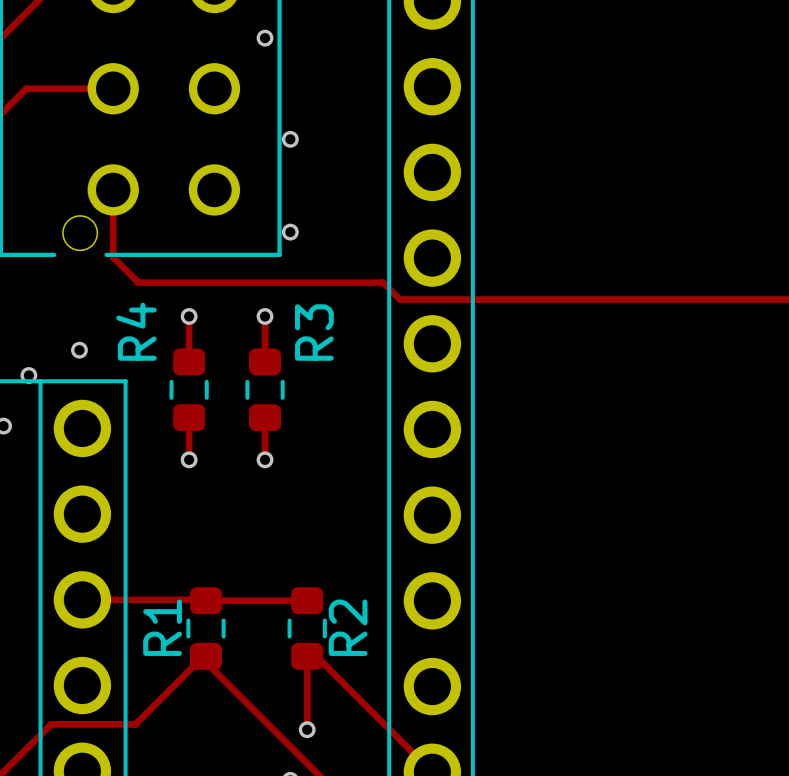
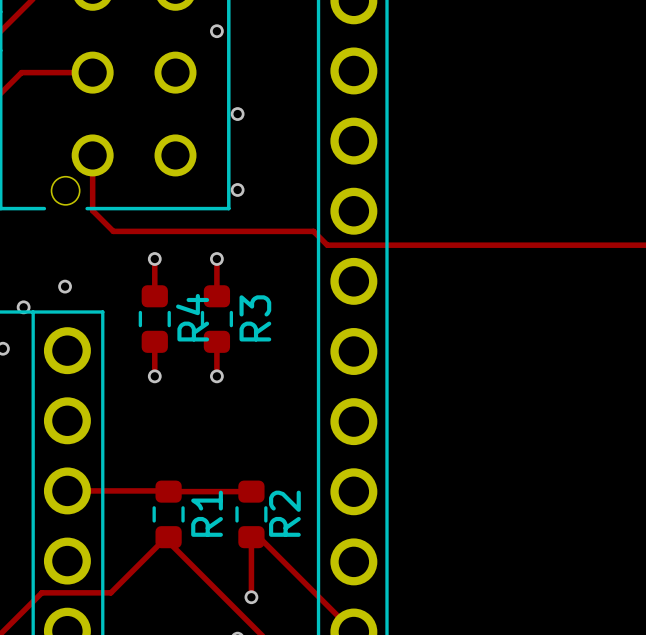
R4 name position: R4 (136, 331) -> R4 (192, 317)
R3 name position: R3 (314, 332) -> R3 (255, 318)
R1 name position: R1 (162, 627) -> R1 (207, 513)

